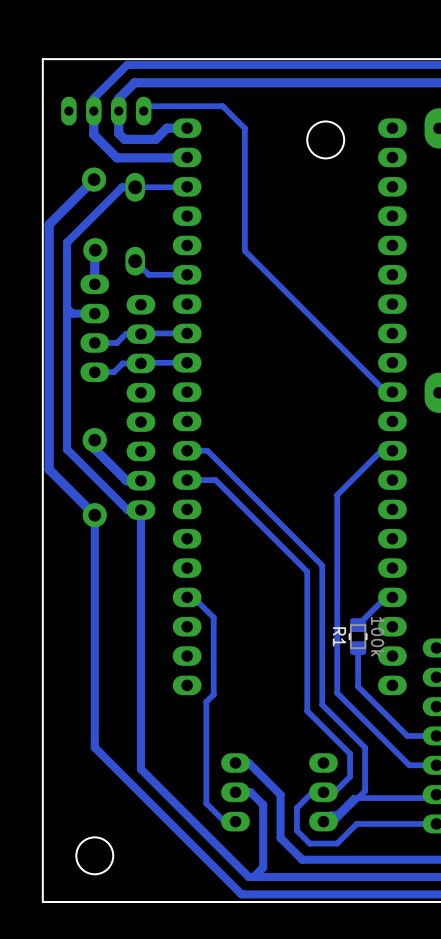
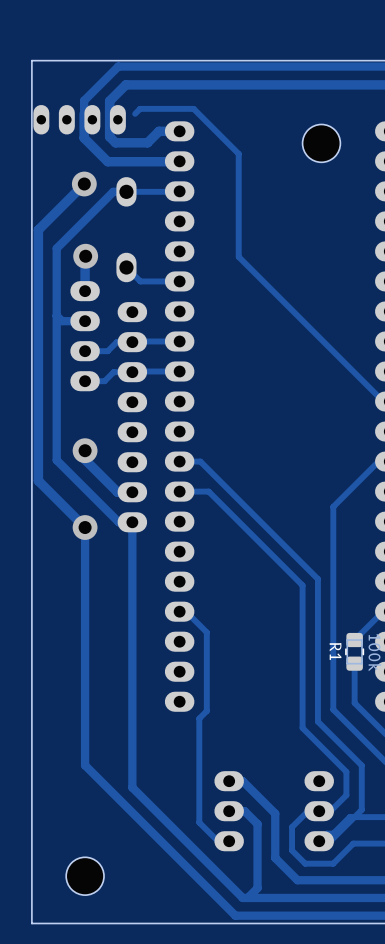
track: (200, 106) (222, 106) (244, 128) (244, 150) -> (193, 108) (238, 153)
part position: (106, 111) -> (79, 119)

